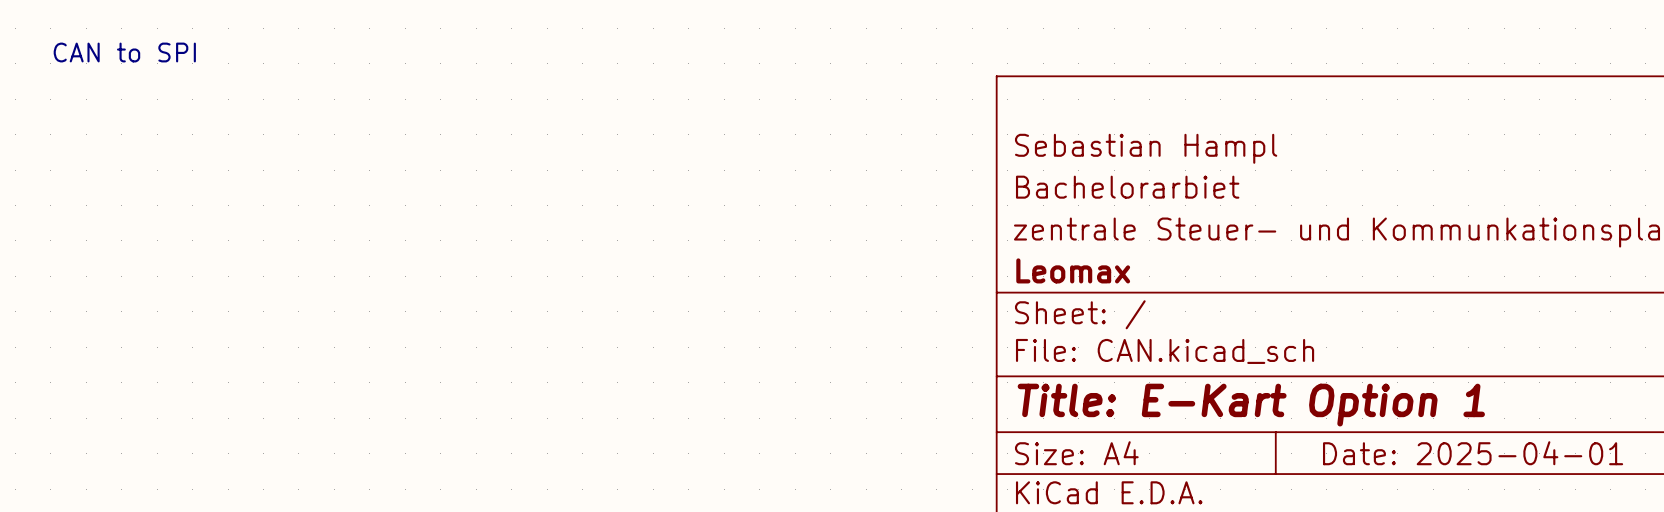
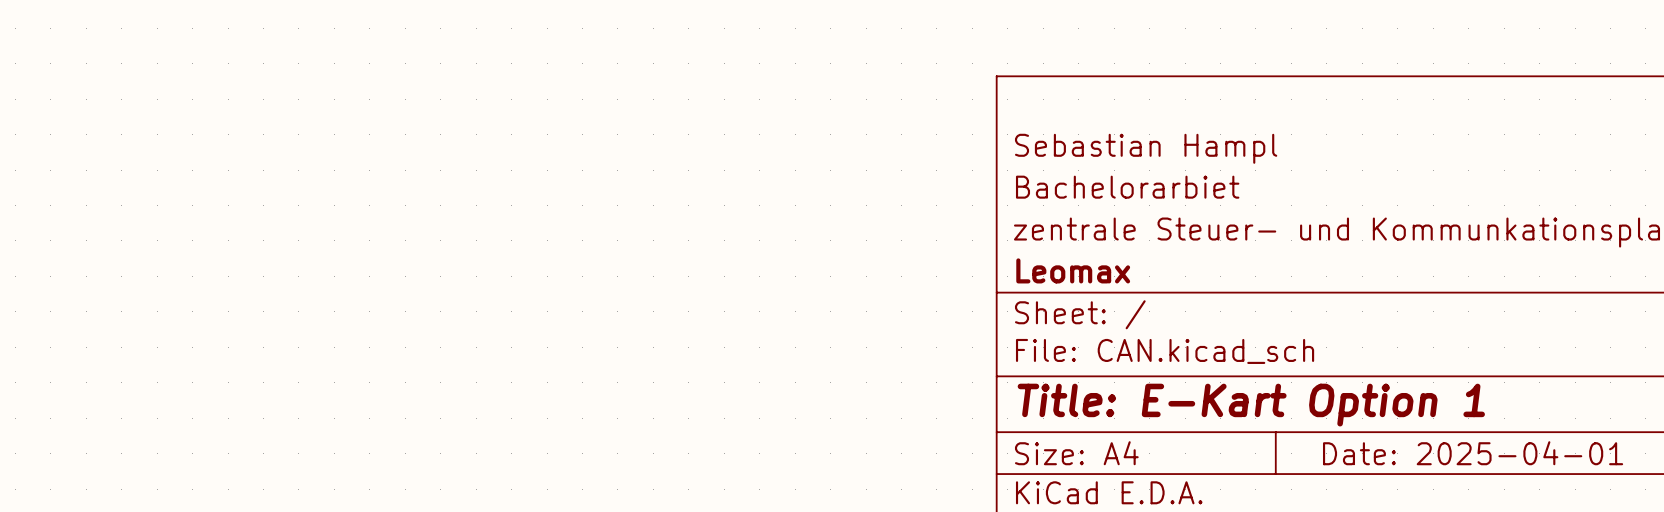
text: CAN to SPI (124, 52) -> none

